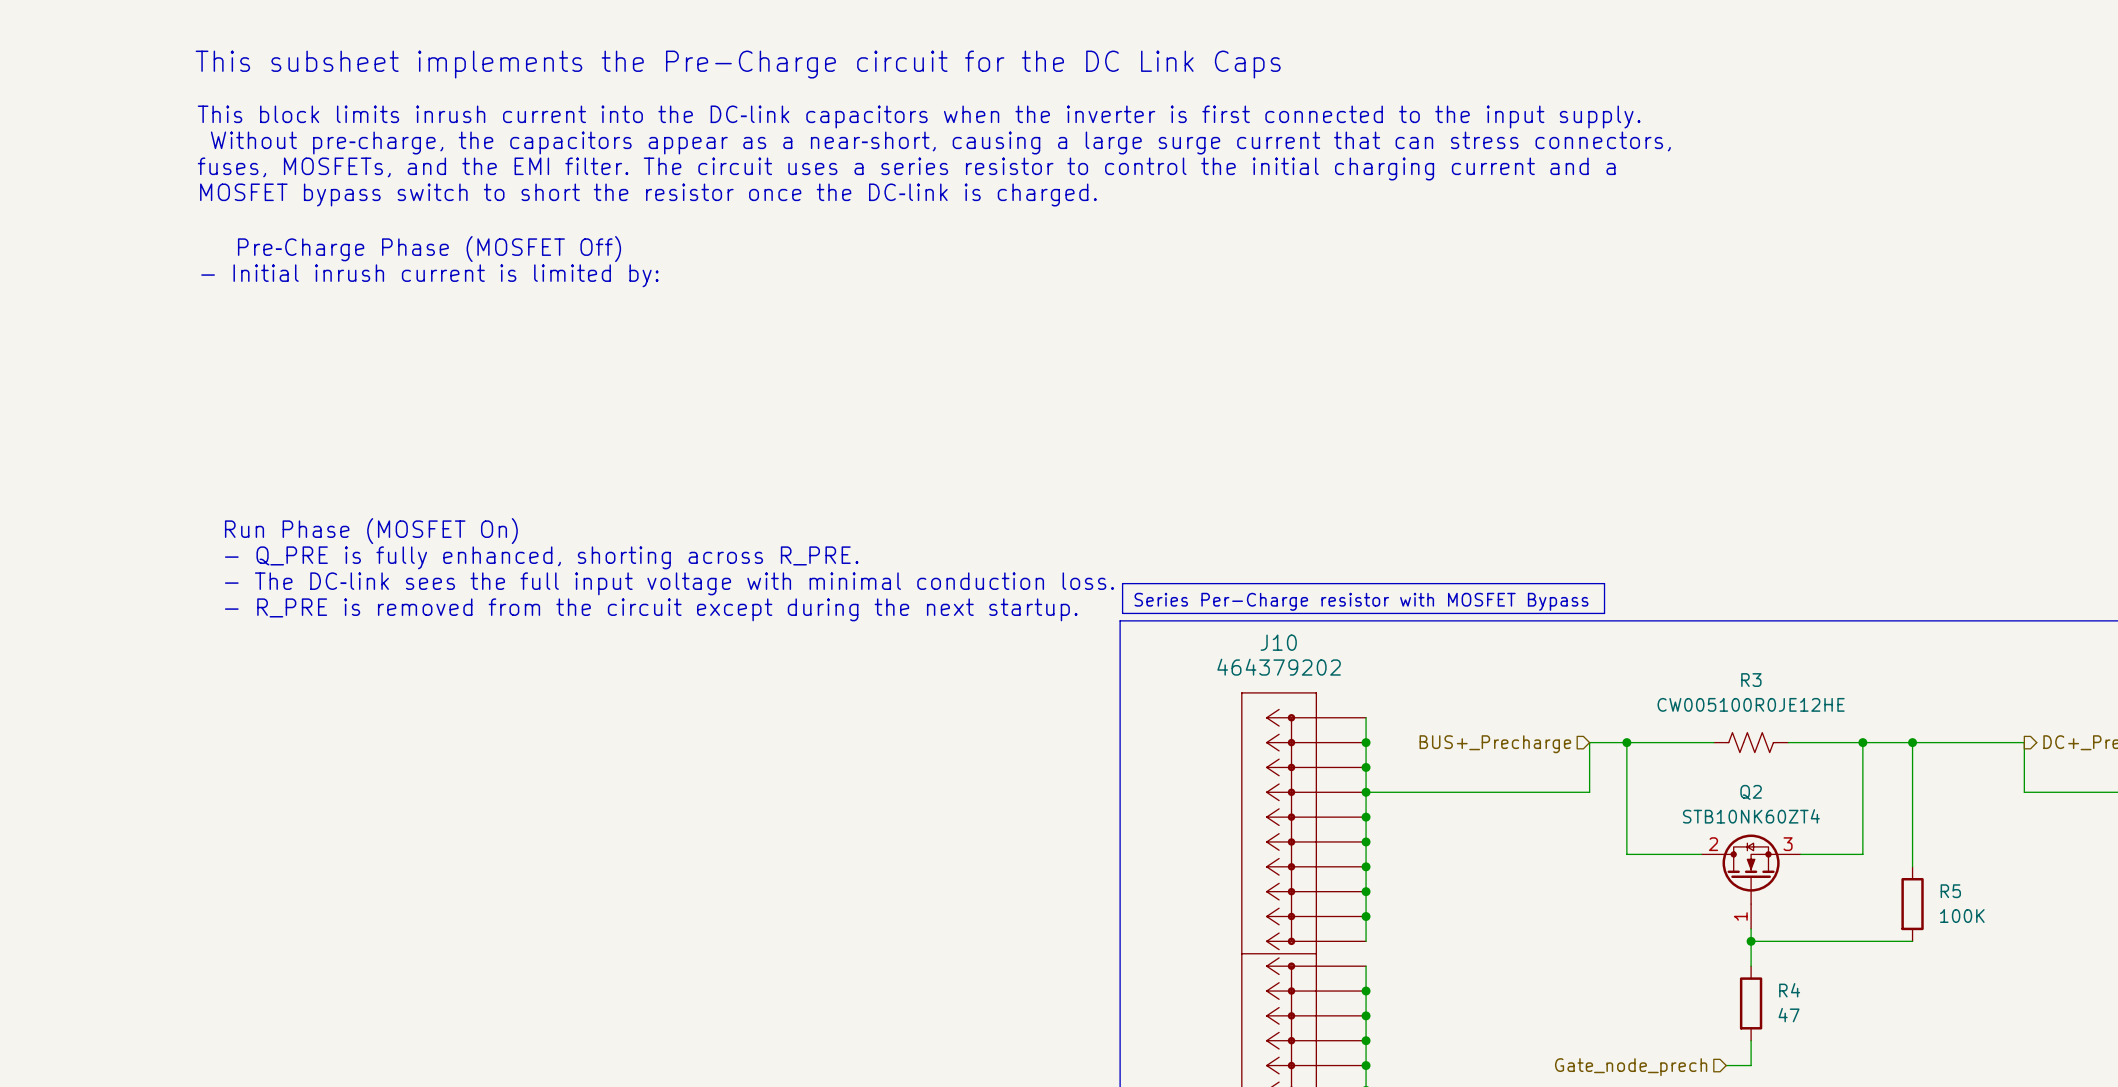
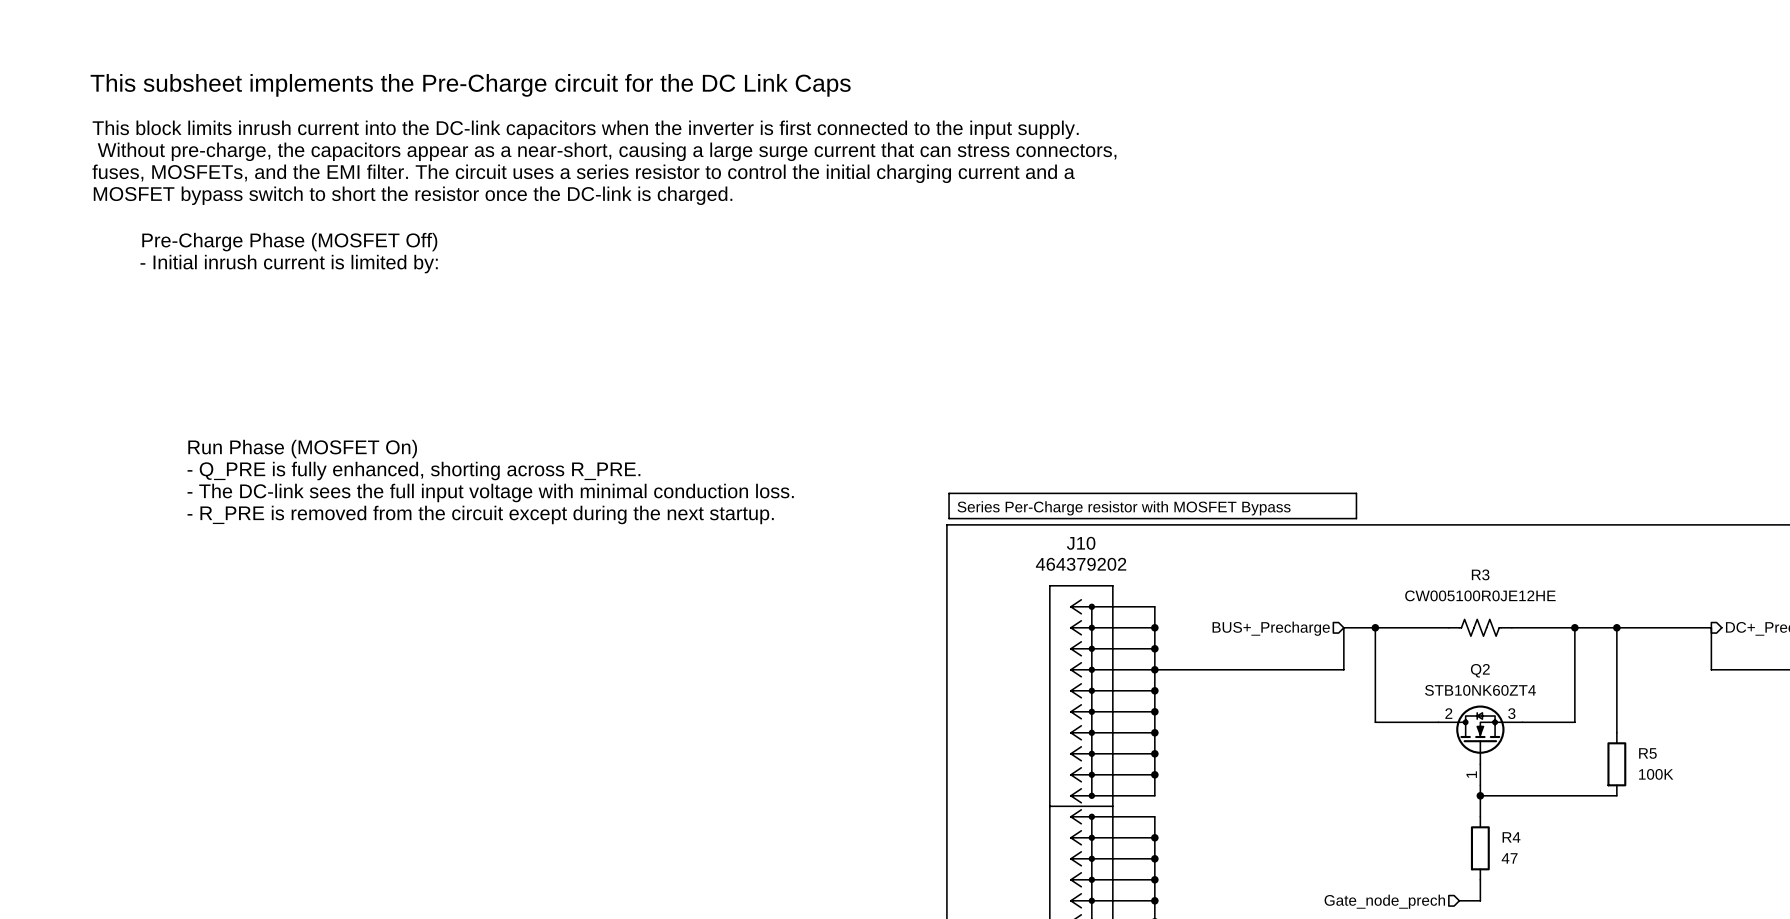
text position: This subsheet implements the Pre-Charge circuit for the DC Link Caps (738, 64) -> This subsheet implements the Pre-Charge circuit for the DC Link Caps (470, 85)
text position: This block limits inrush current into the DC‑link capacitors when the inverter is first connected to the input supply. (919, 116) -> This block limits inrush current into the DC‑link capacitors when the inverter is first connected to the input supply. (585, 129)
text position: Without pre‑charge, the capacitors appear as a near‑short, causing a large surge current that can stress connectors, (940, 142) -> Without pre‑charge, the capacitors appear as a near‑short, causing a large surge current that can stress connectors, (607, 151)
text position: fuses, MOSFETs, and the EMI filter. The circuit uses a series resistor to control the initial charging current and a (906, 168) -> fuses, MOSFETs, and the EMI filter. The circuit uses a series resistor to control the initial charging current and a (583, 173)
text position: MOSFET bypass switch to short the resistor once the DC‑link is charged. (648, 194) -> MOSFET bypass switch to short the resistor once the DC‑link is charged. (413, 195)
text position: Pre‑Charge Phase (MOSFET Off) (429, 249) -> Pre‑Charge Phase (MOSFET Off) (289, 242)
text position: - Initial inrush current is limited by: (429, 275) -> - Initial inrush current is limited by: (289, 264)

